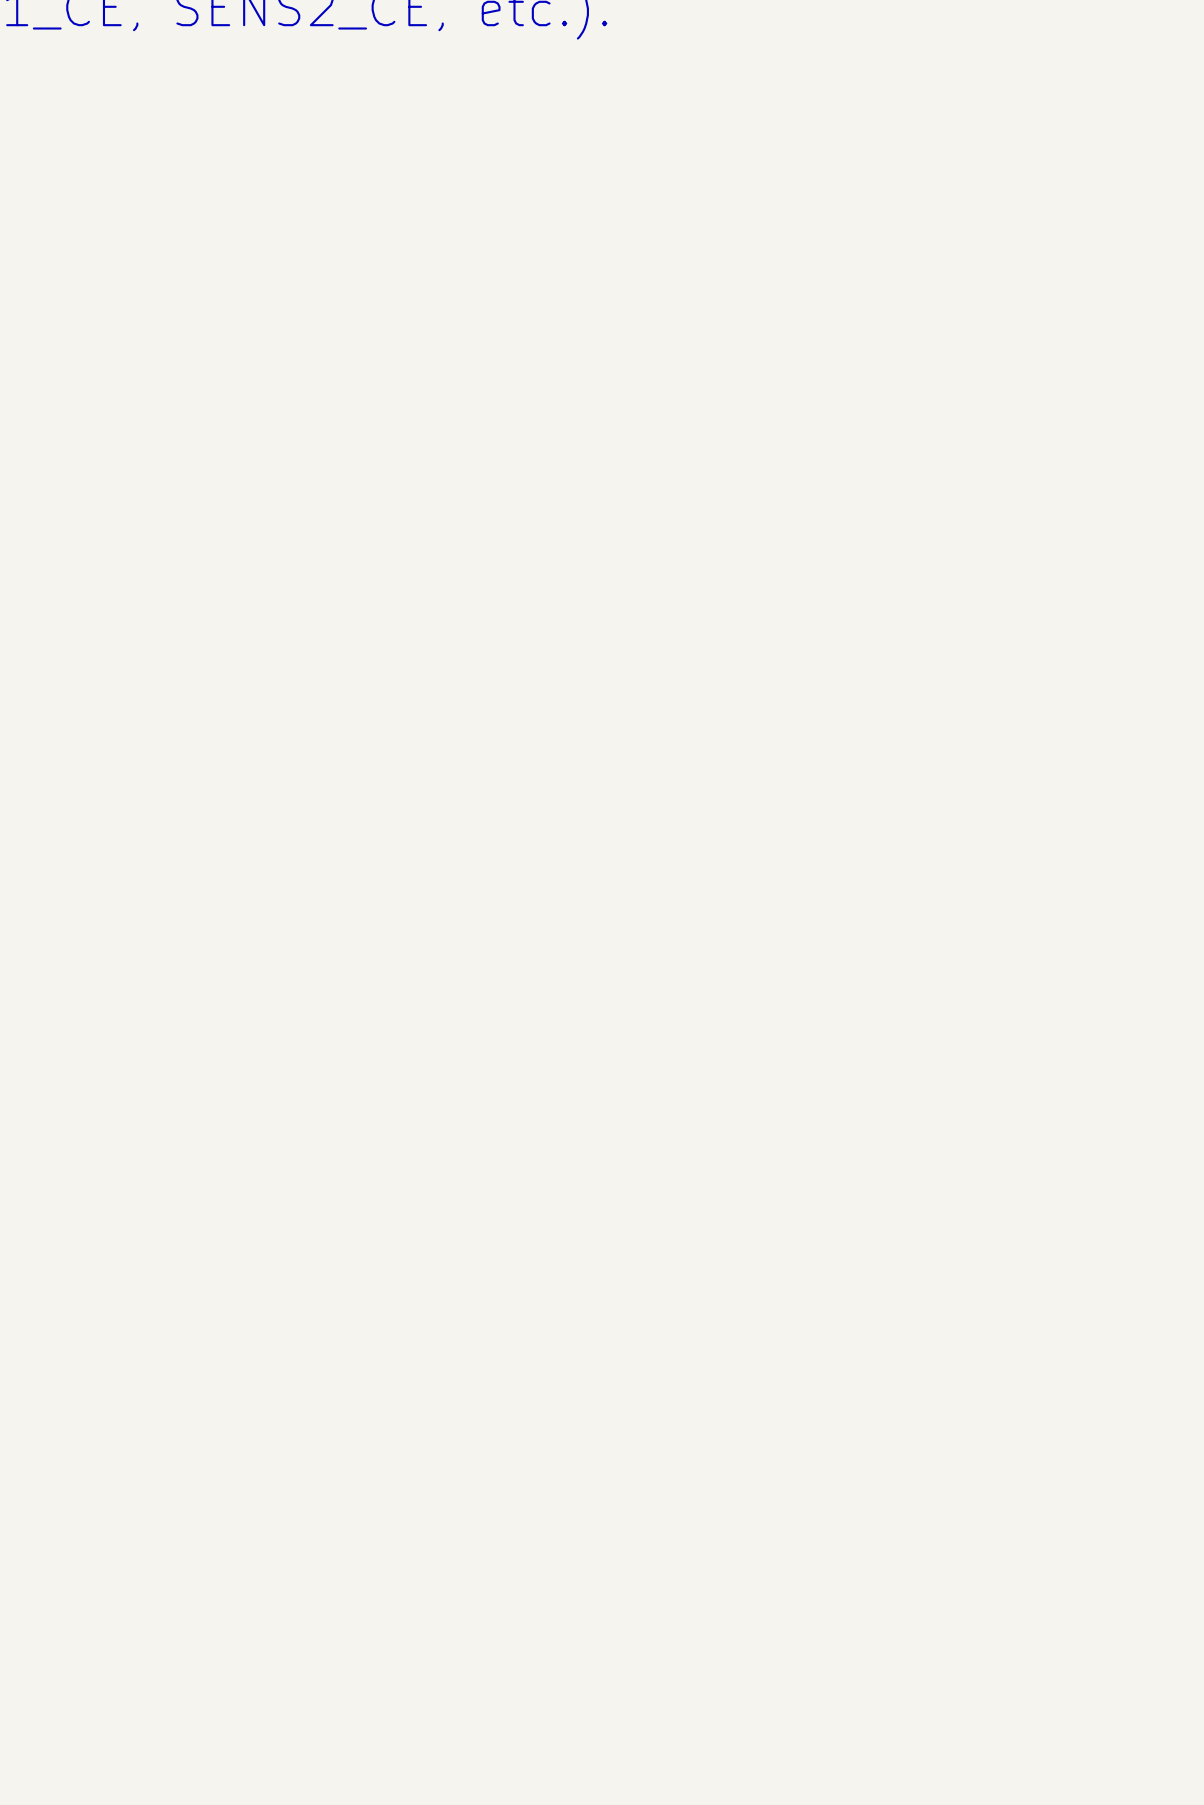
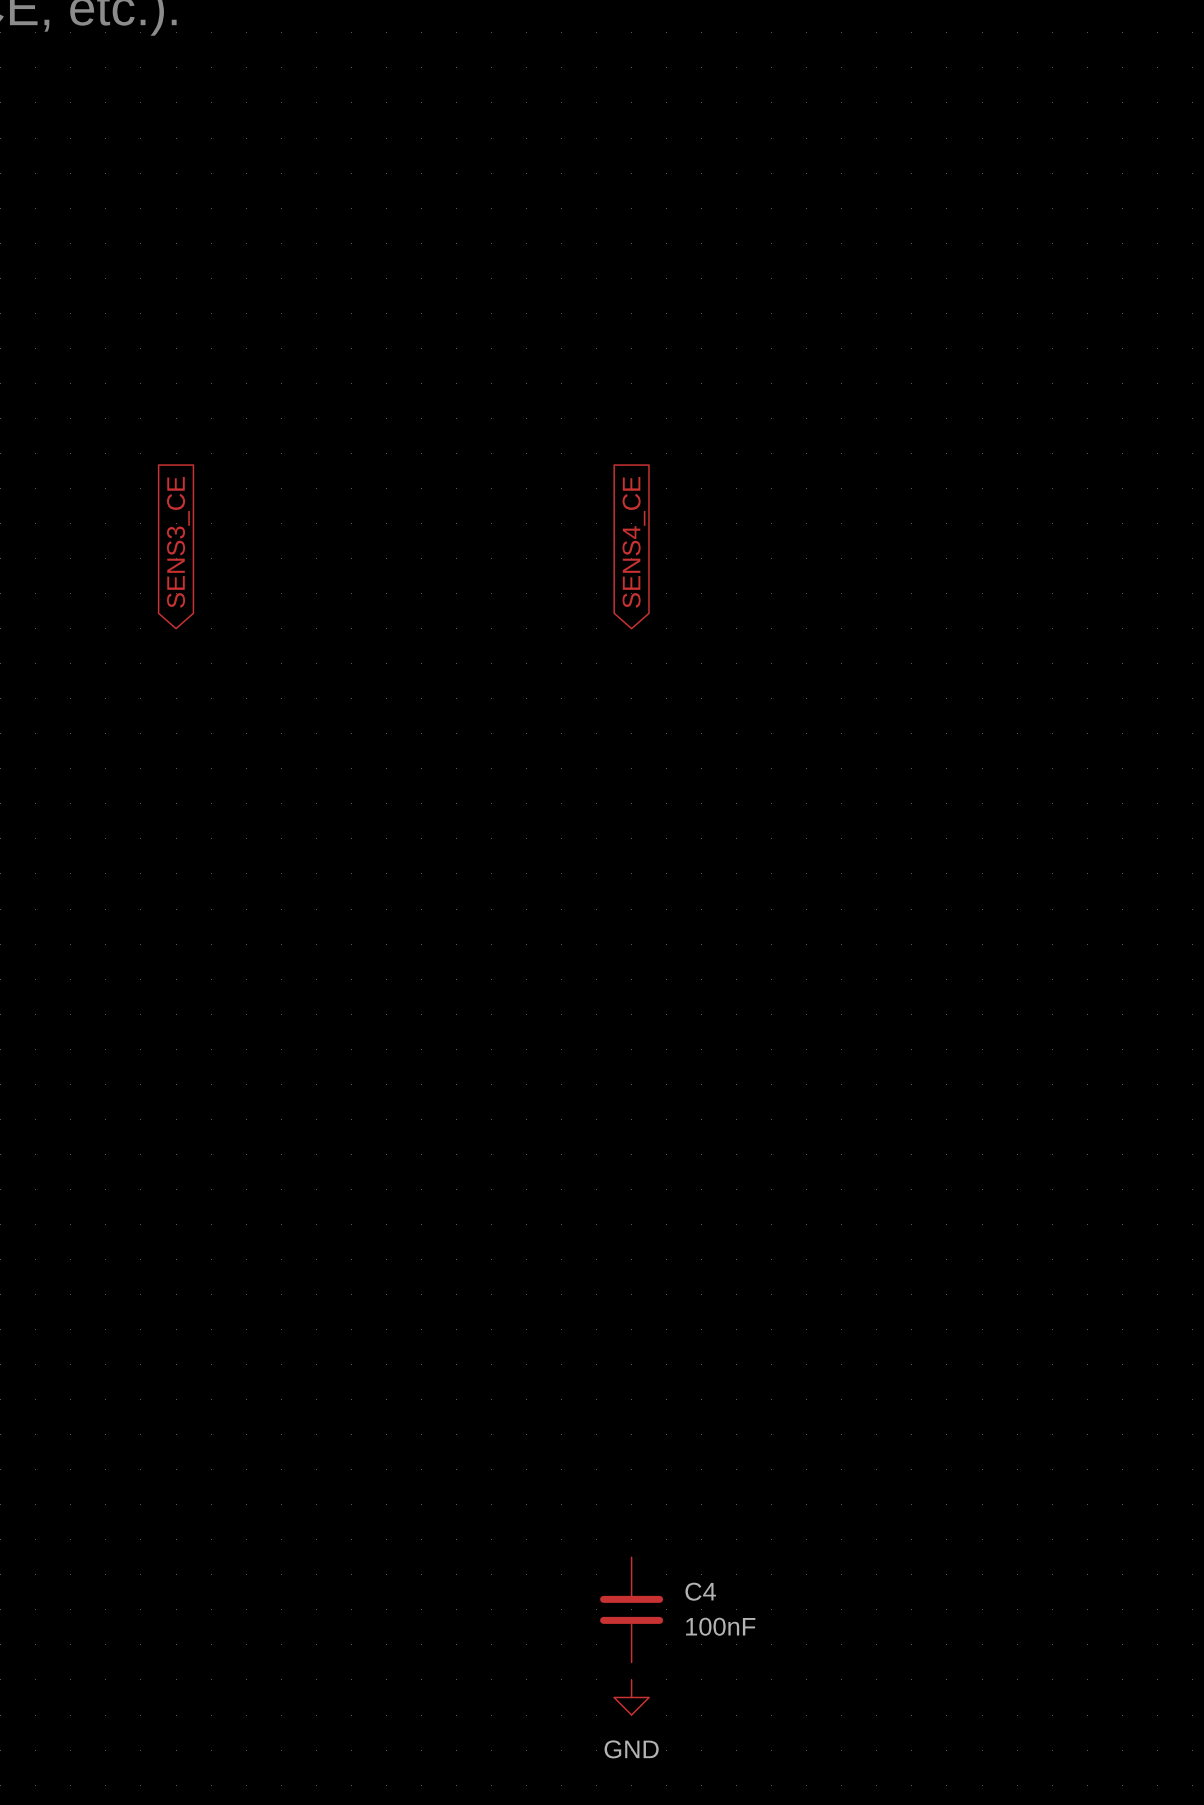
global label: none -> SENS3_CE (178, 542)
global label: none -> SENS4_CE (633, 542)
C4: none -> 100nF (631, 1609)
power symbol: none -> GND (631, 1697)

